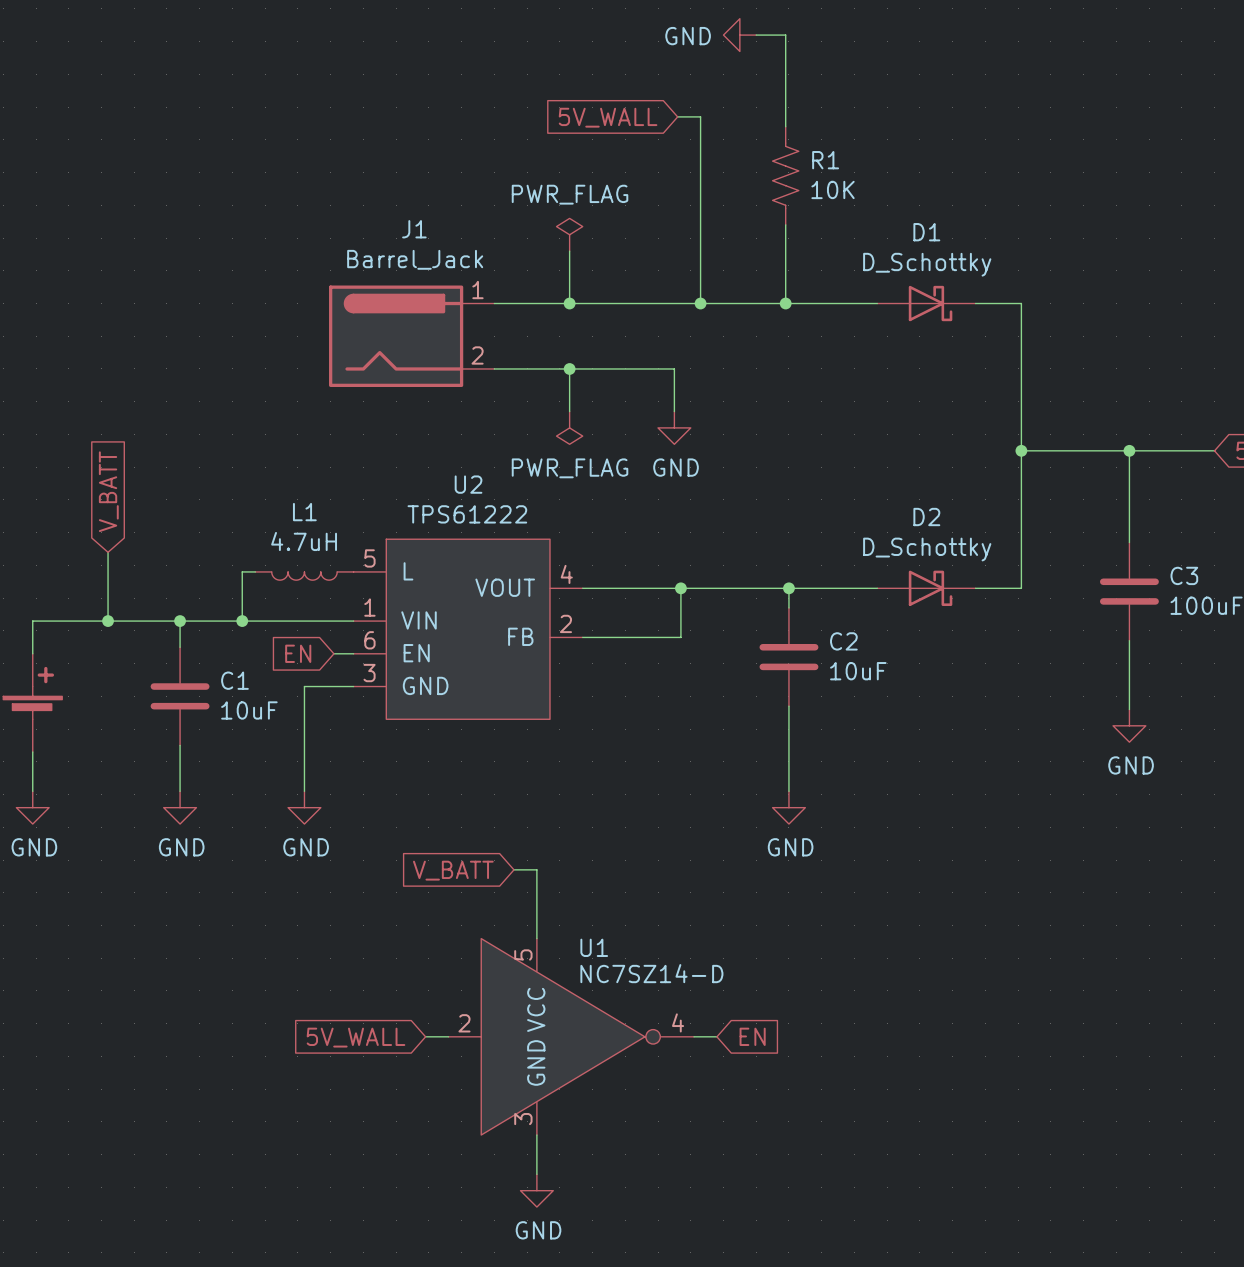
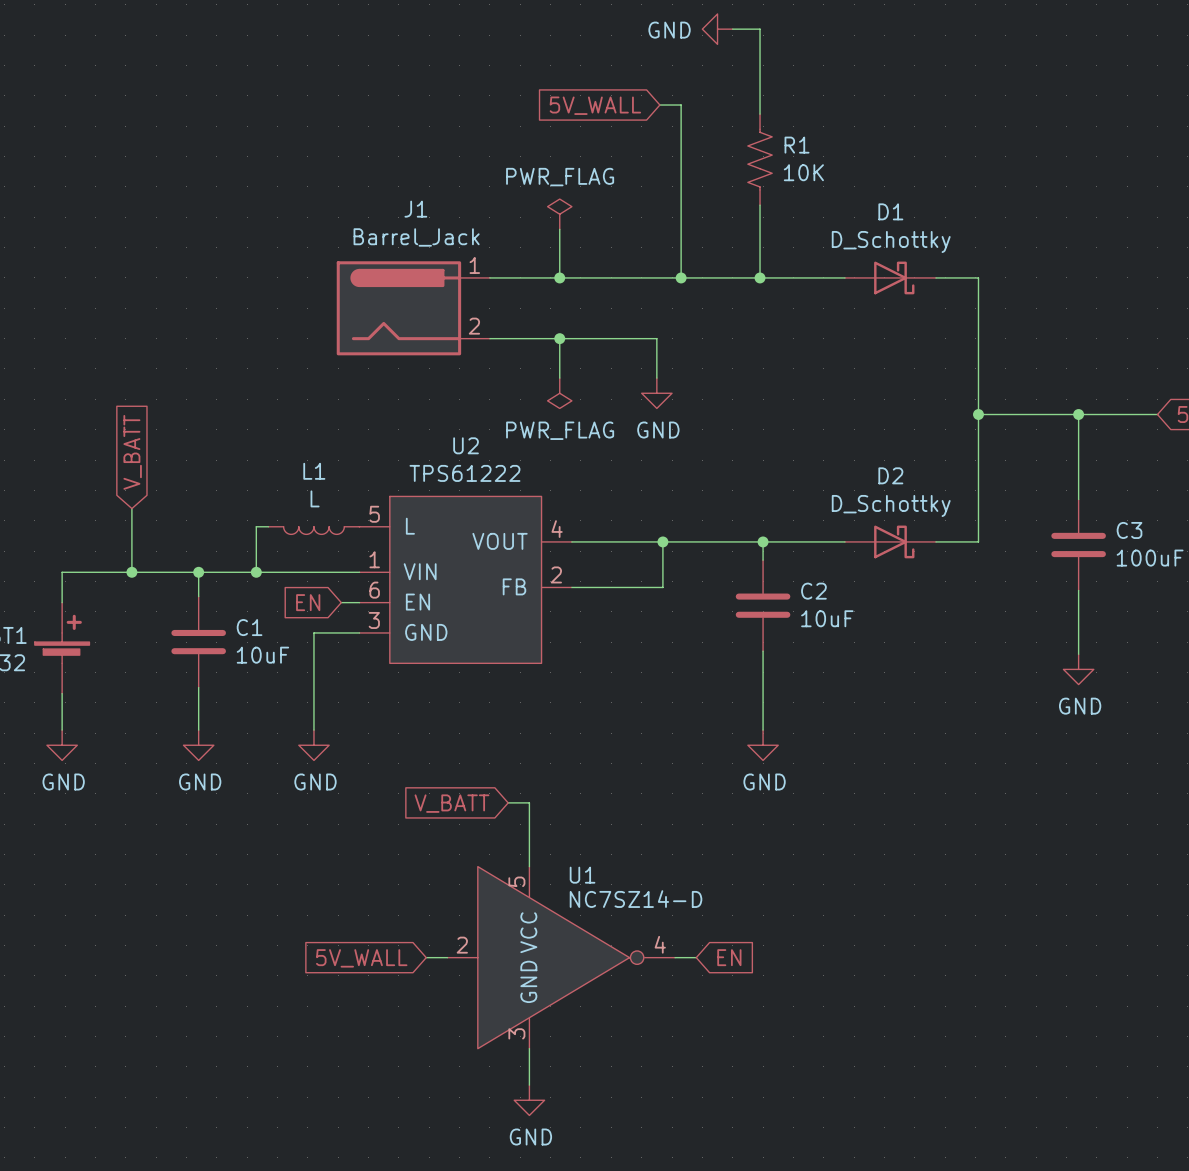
L1 value: 4.7uH (304, 541) -> L (315, 498)

